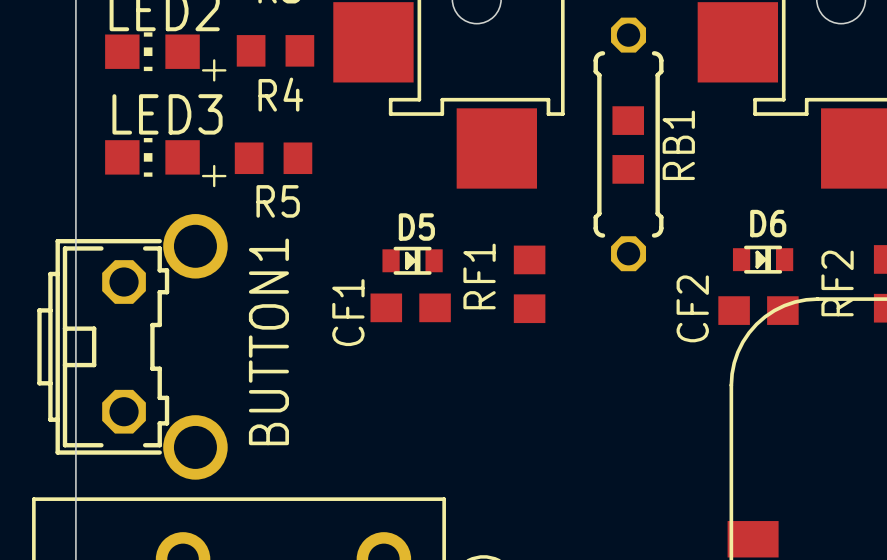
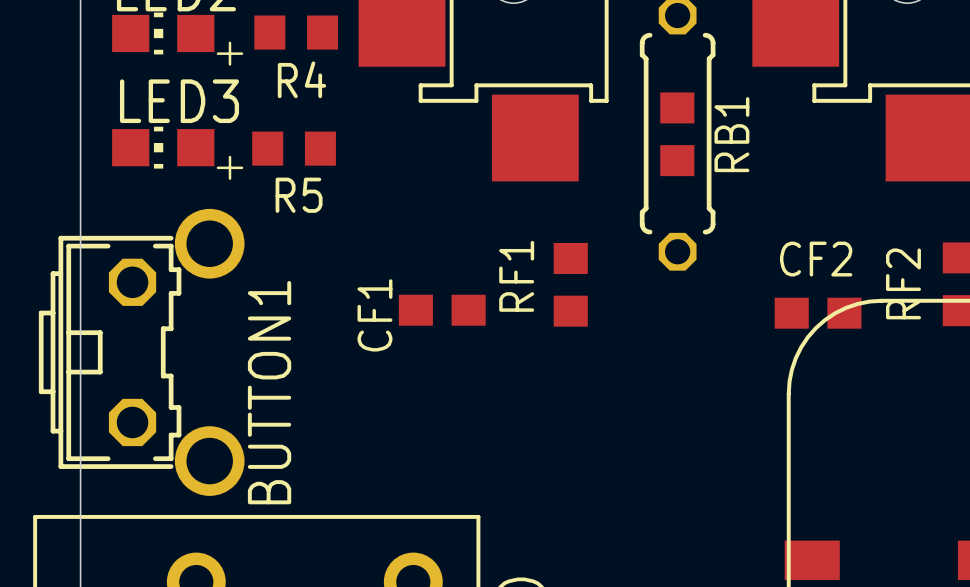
D6: (763, 259) -> none
D5: (412, 260) -> none
CF2 name rotation: 0° (692, 308) -> 90° clockwise (816, 259)
BUTTON1 name position: BUTTON1 (268, 341) -> BUTTON1 (269, 392)

